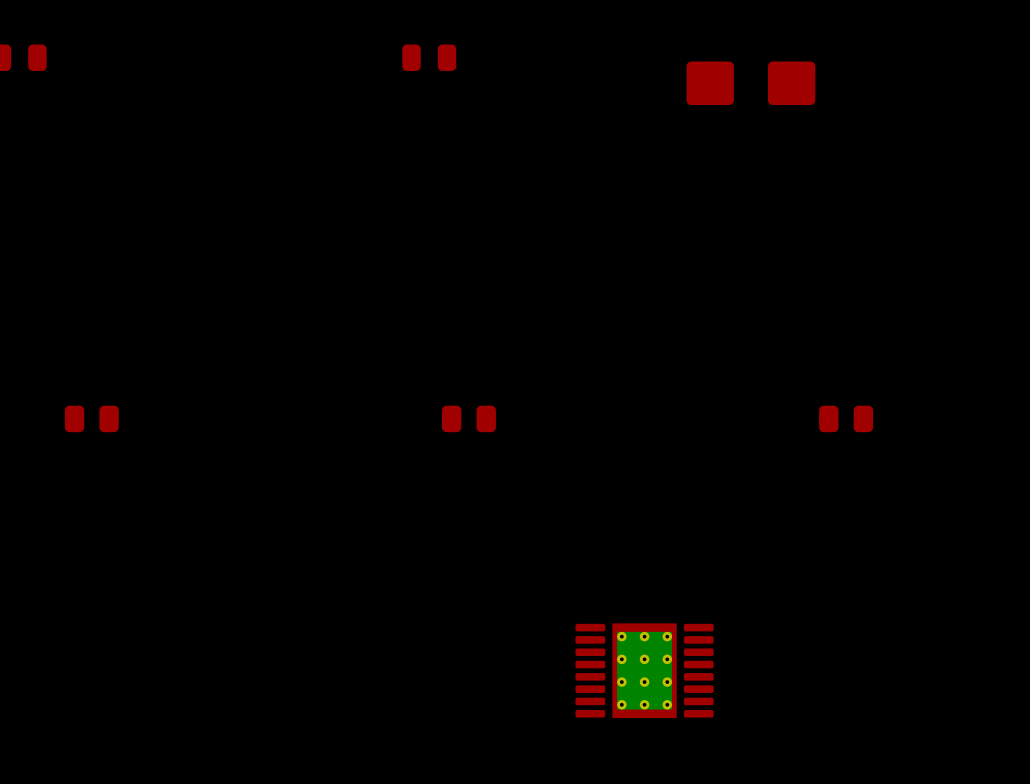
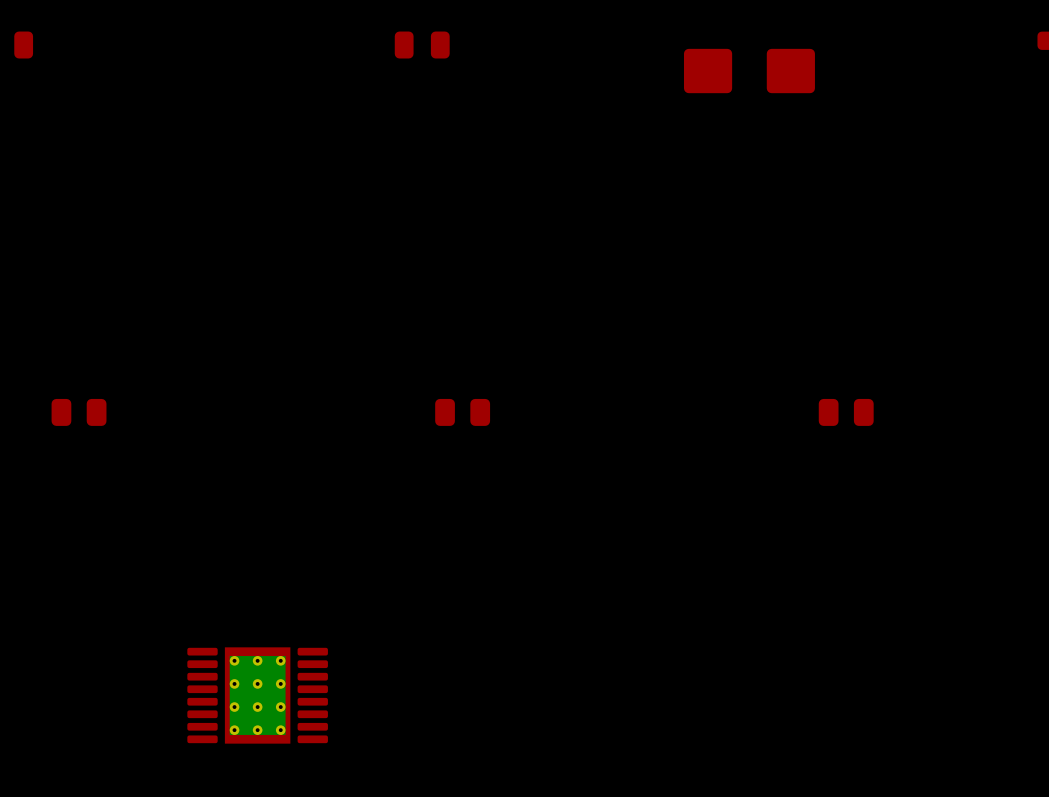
part position: (644, 670) -> (257, 695)

